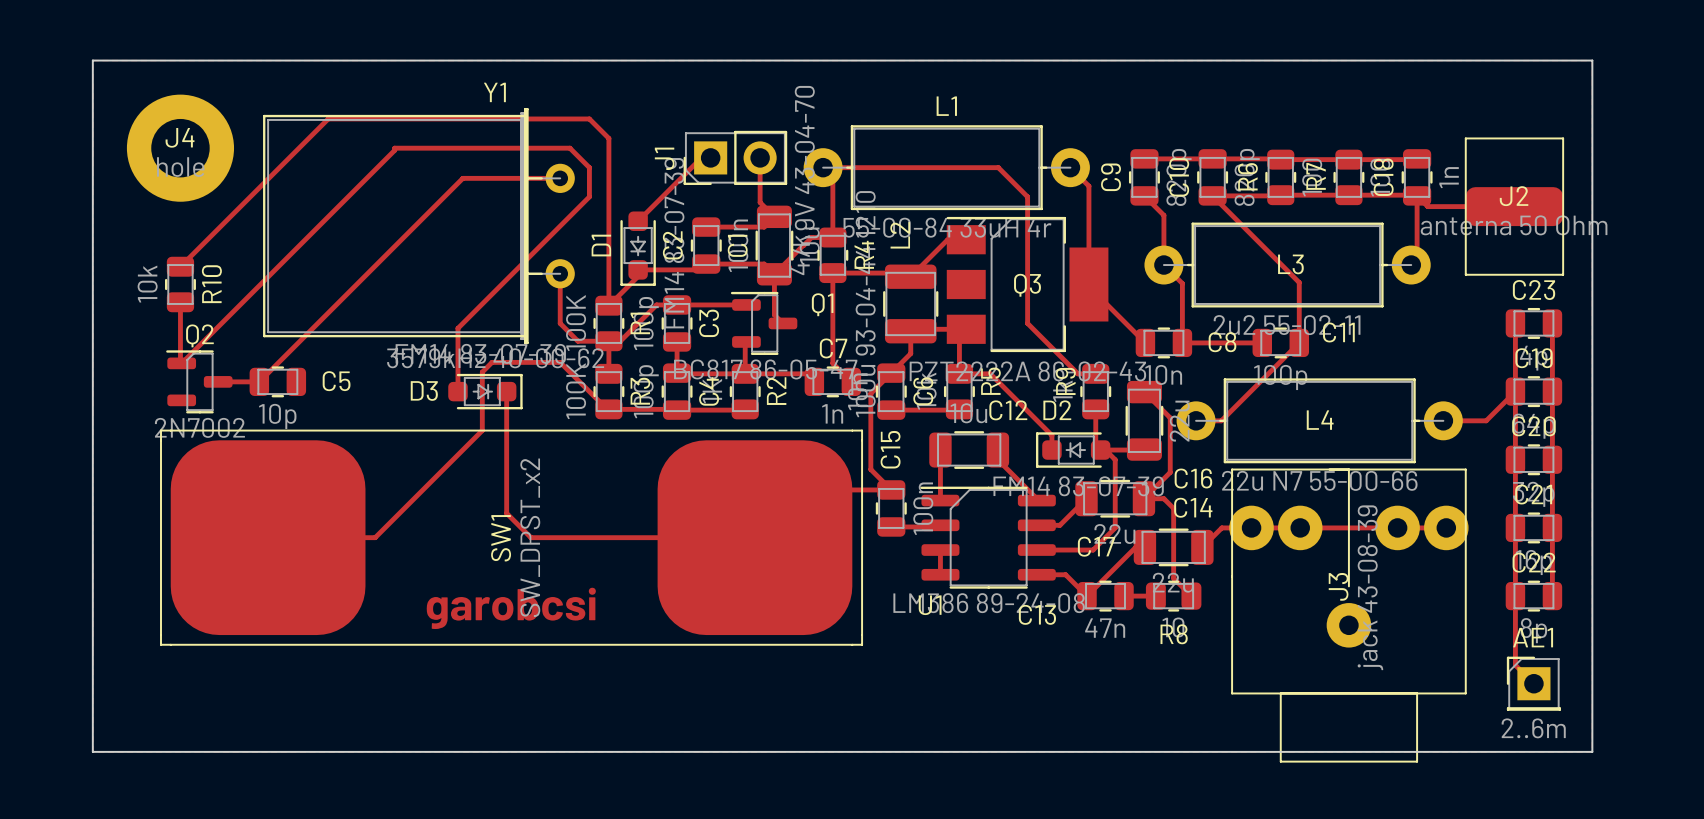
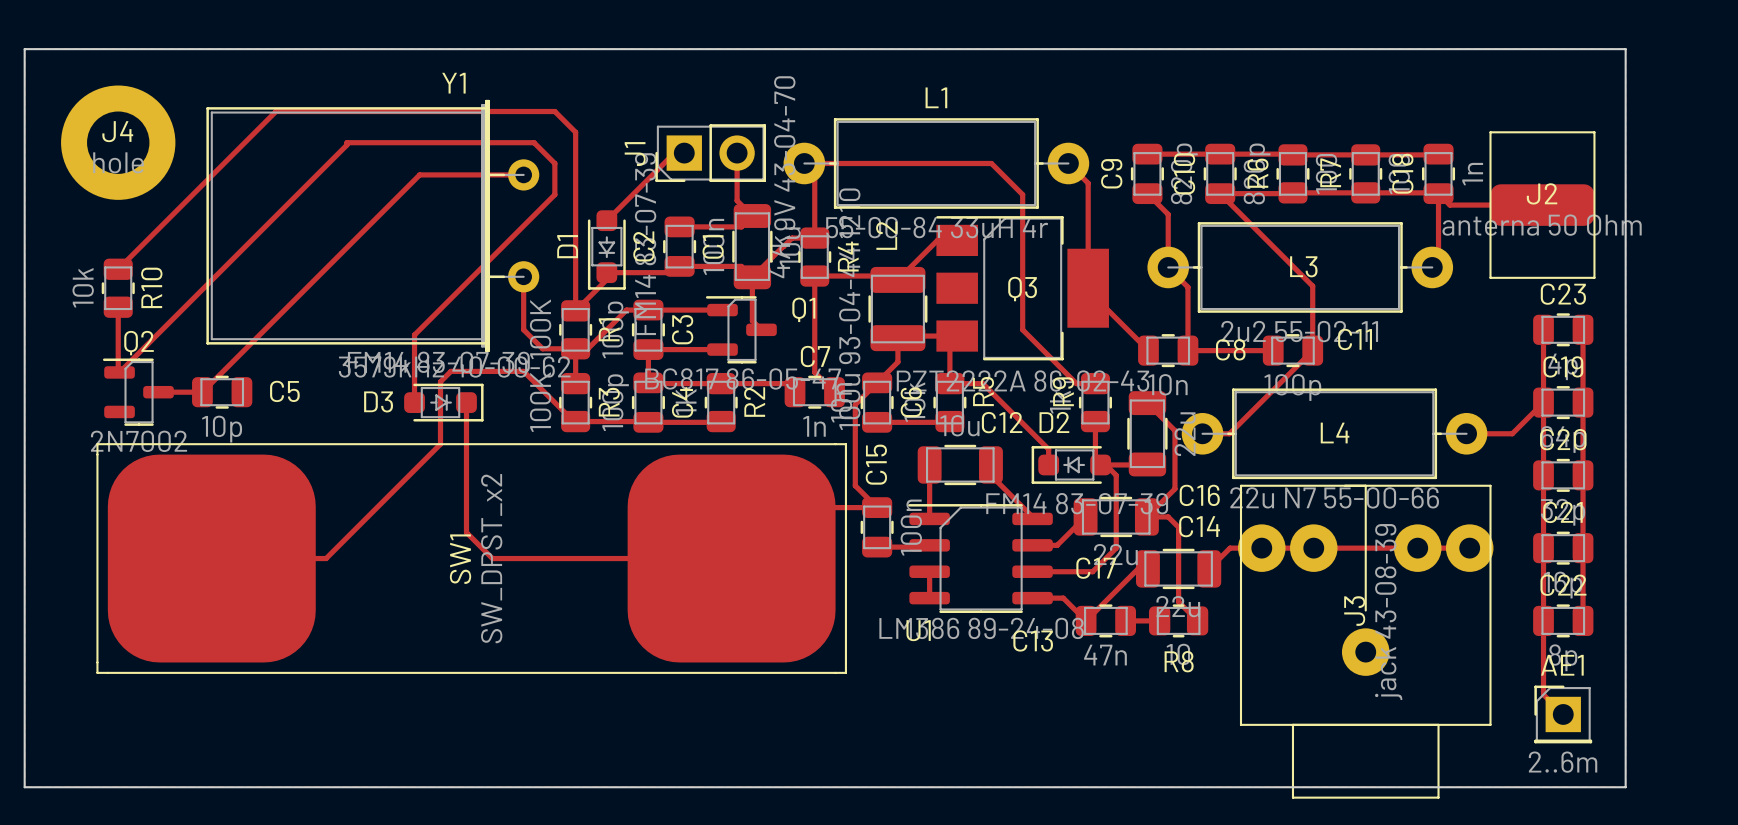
track: (746, 341) (745, 373) -> (722, 349) (648, 349)
text: garobcsi (511, 608) -> none

